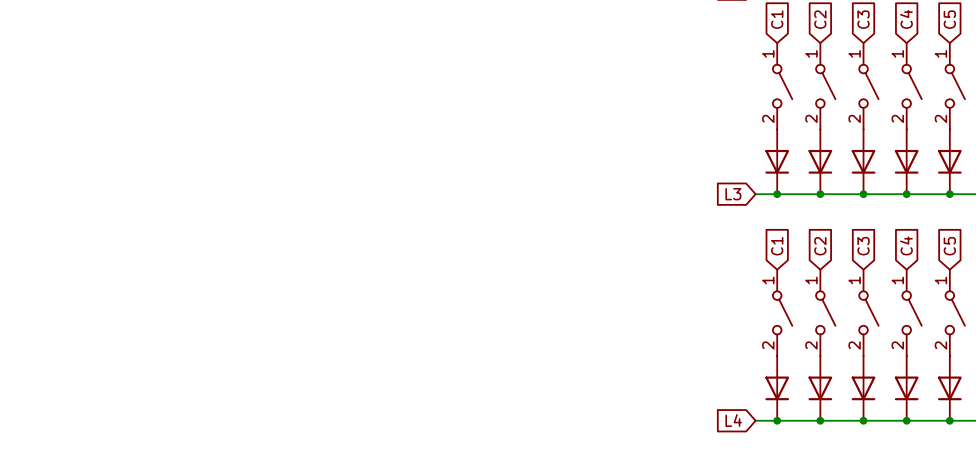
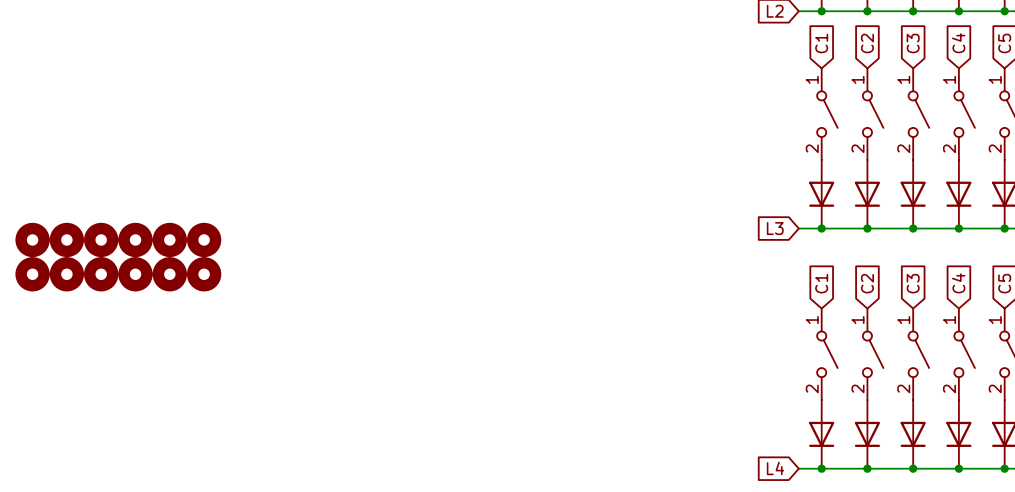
part: none -> (32, 239)
part: none -> (66, 239)
part: none -> (101, 239)
part: none -> (135, 239)
part: none -> (169, 239)
part: none -> (204, 239)
part: none -> (32, 274)
part: none -> (66, 274)
part: none -> (101, 274)
part: none -> (135, 274)
part: none -> (169, 274)
part: none -> (204, 274)

